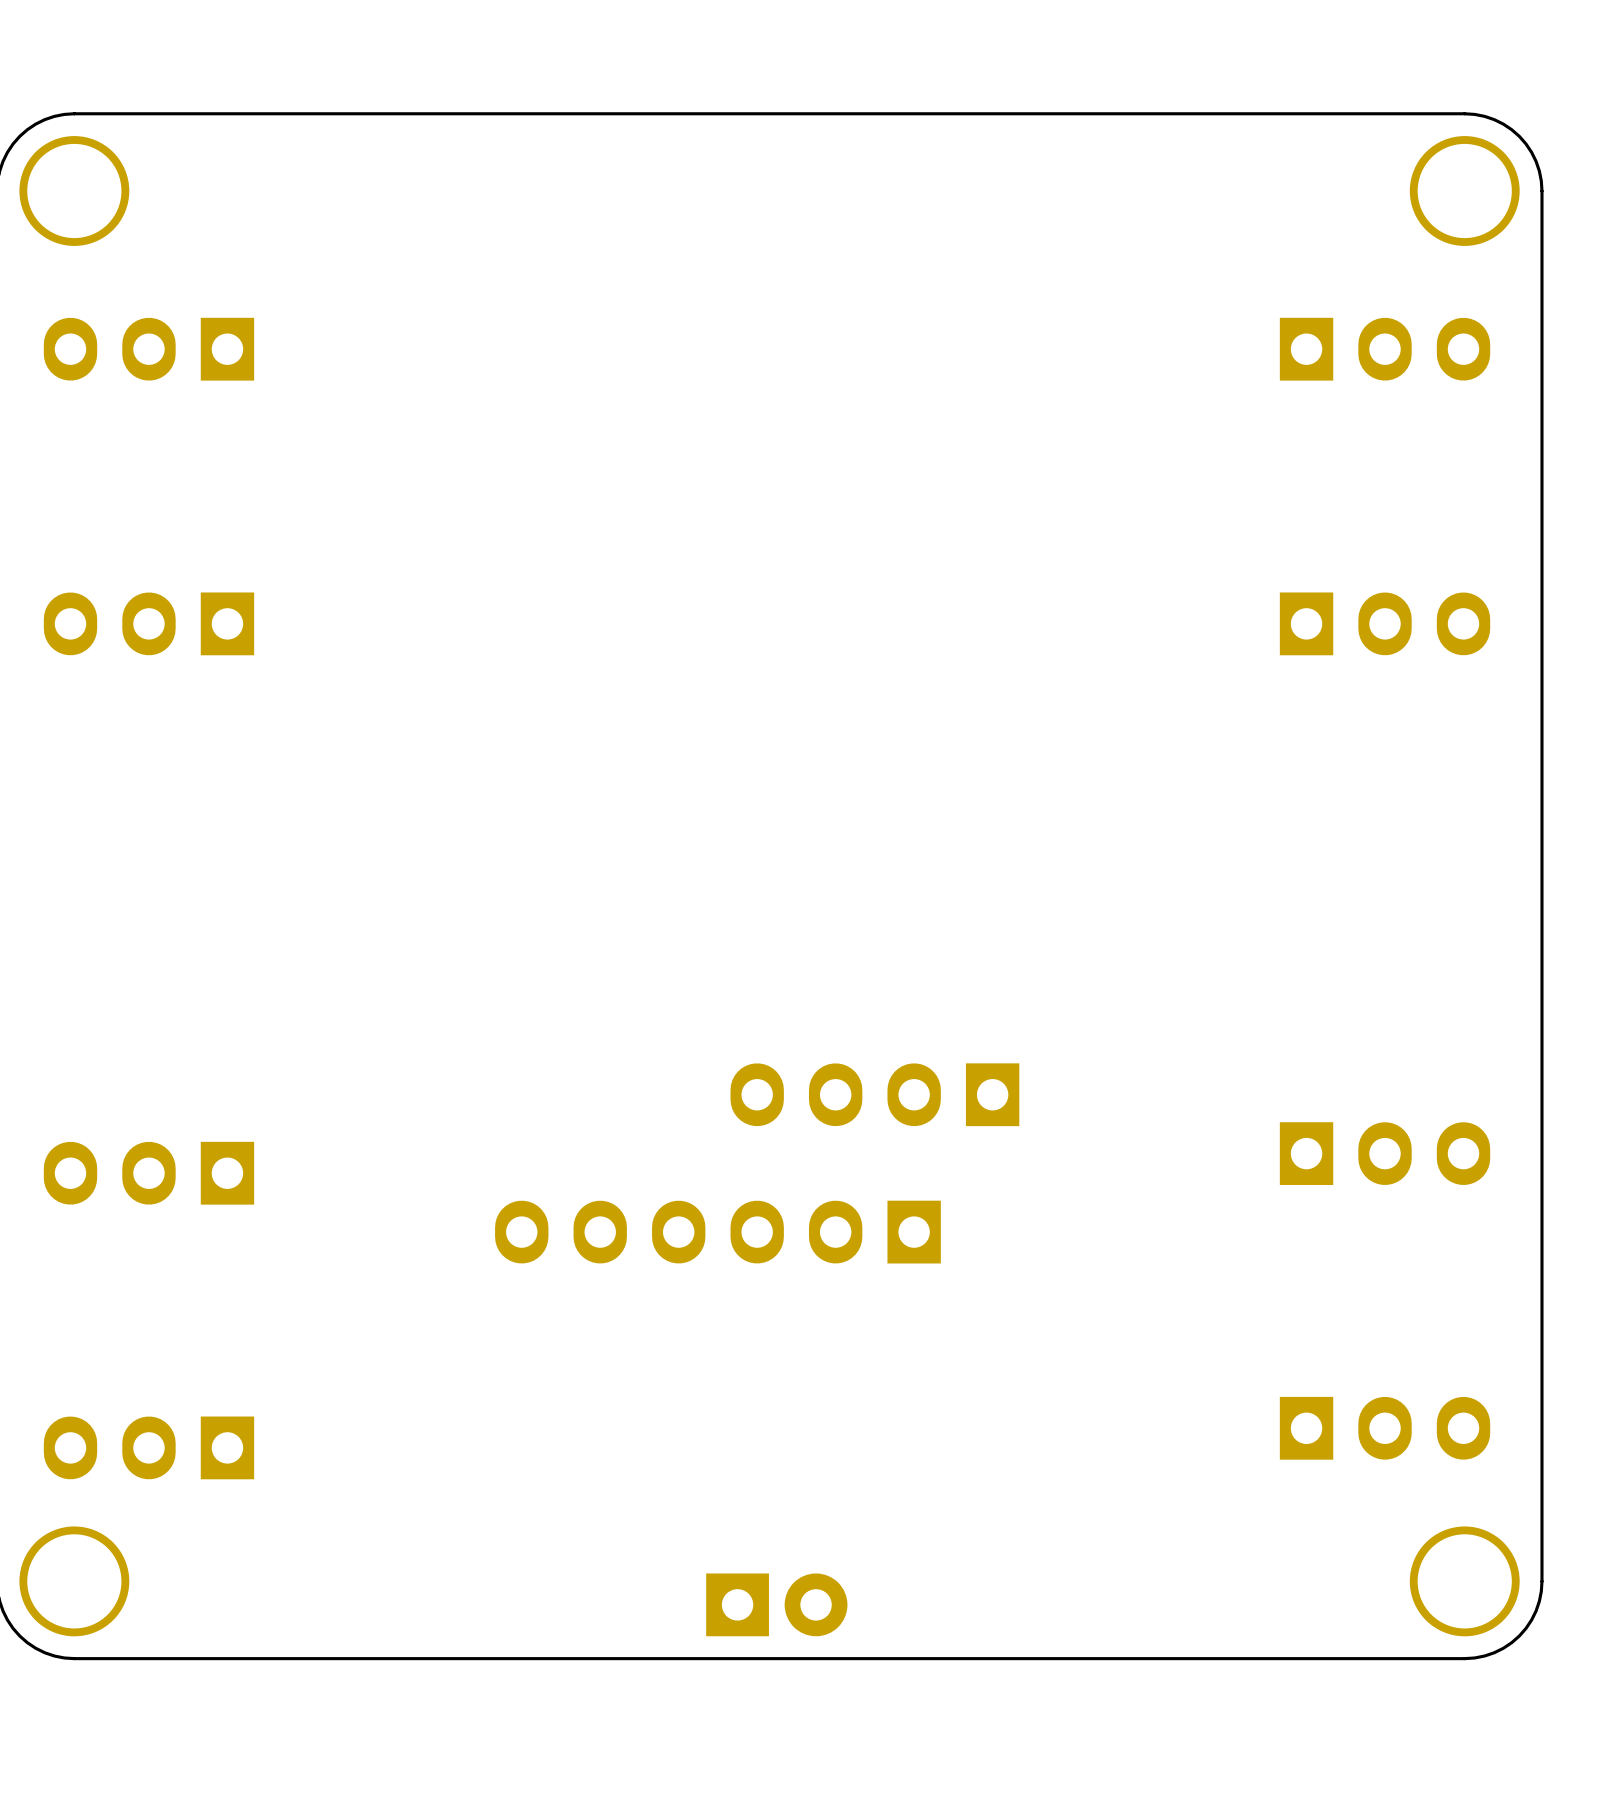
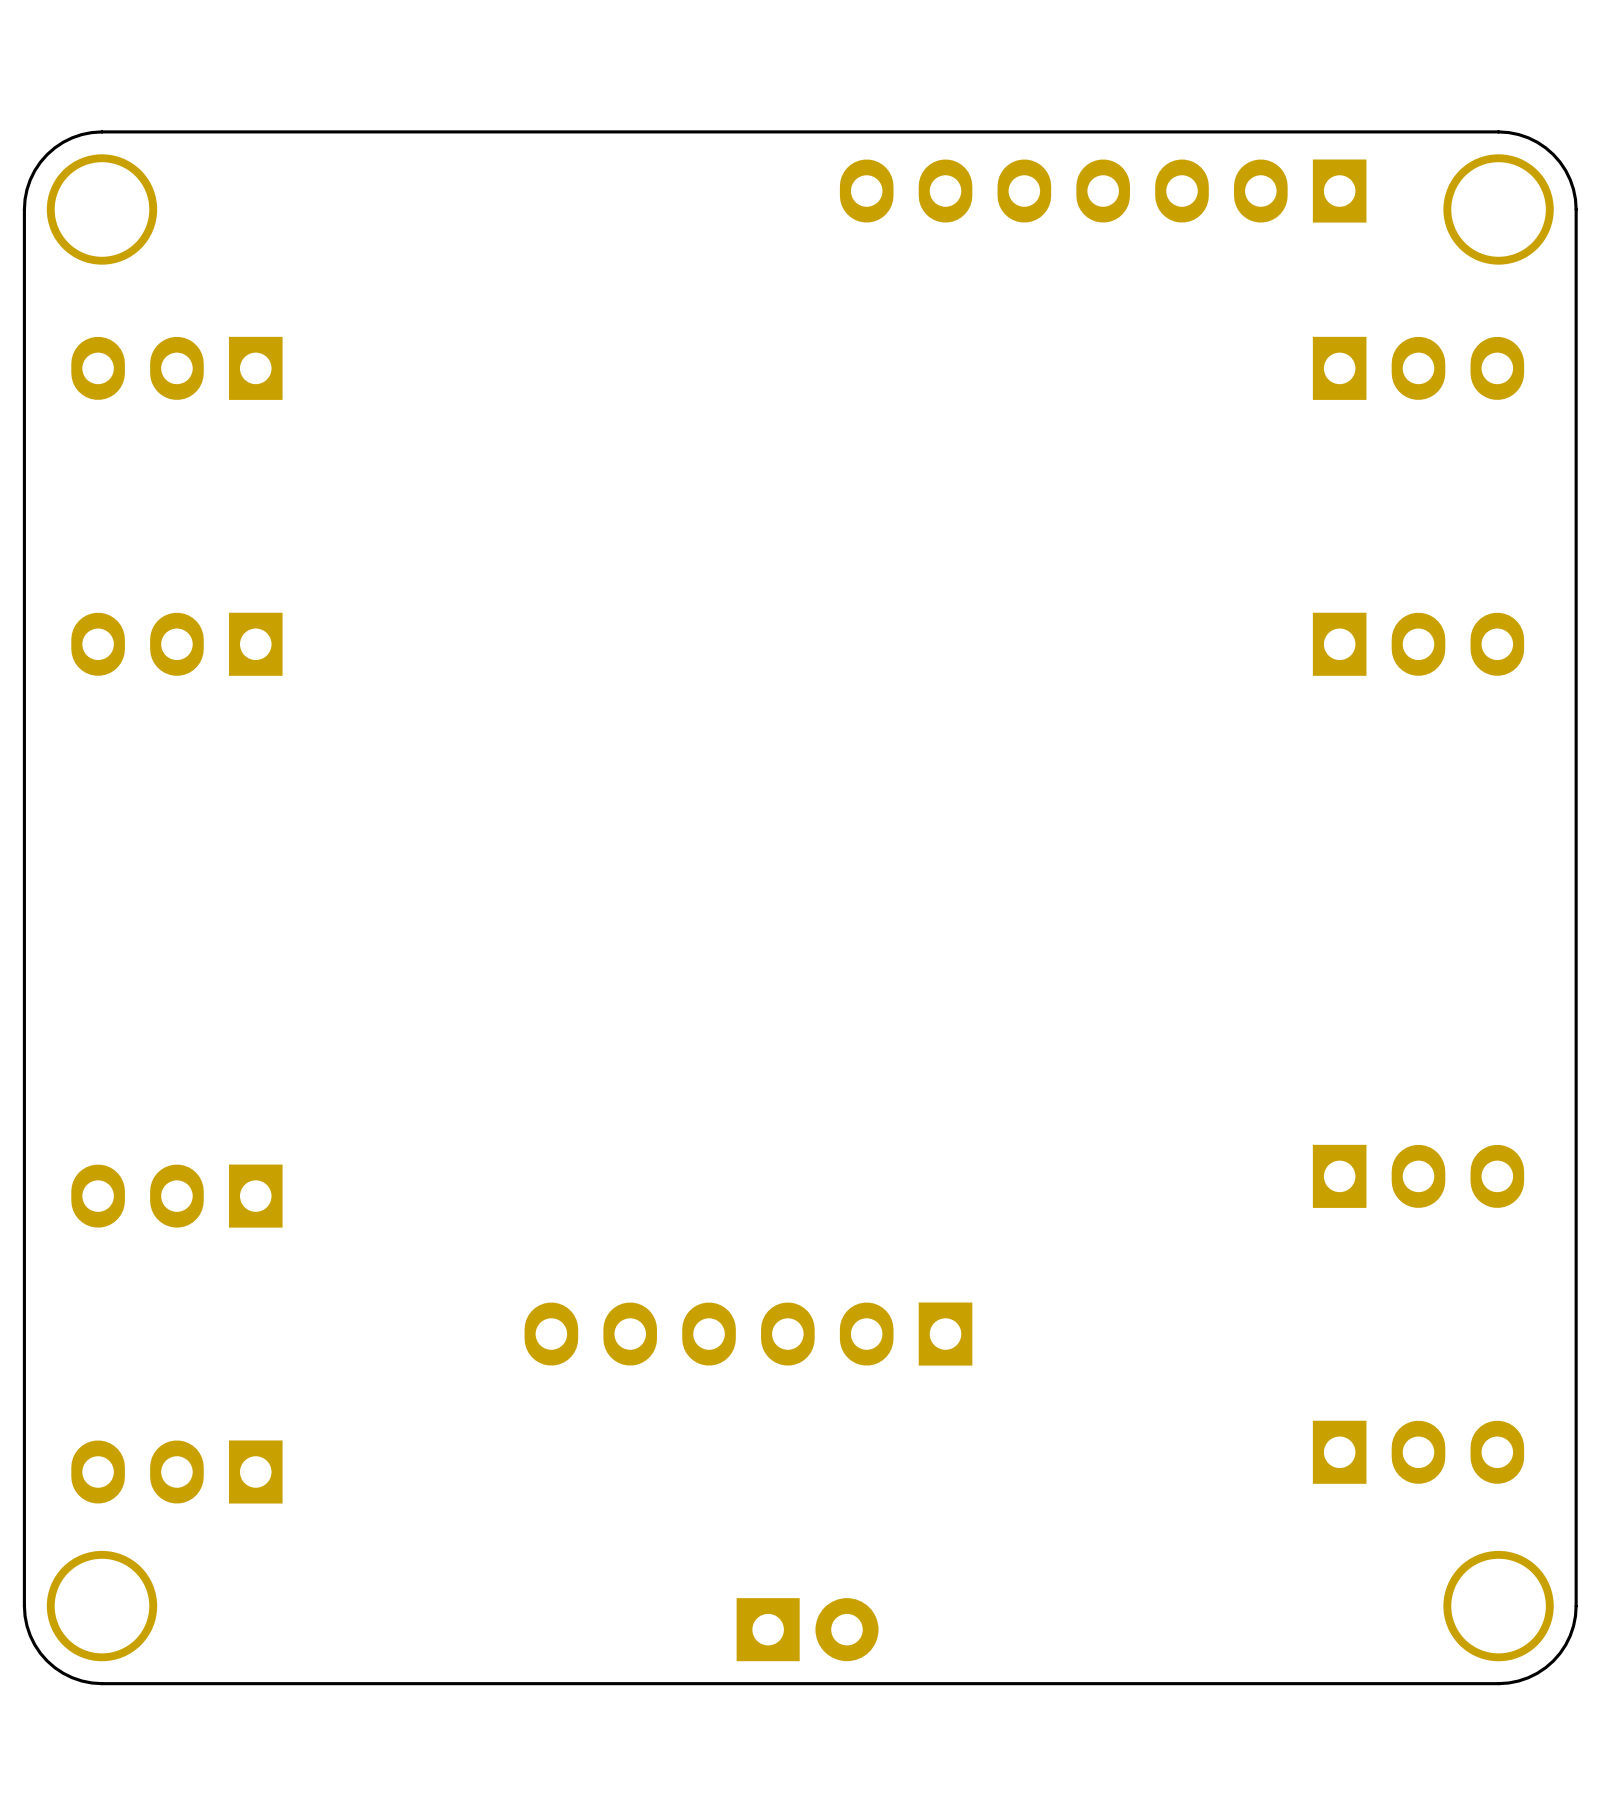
part: none -> (1103, 191)
part: (874, 1094) -> none
part position: (717, 1232) -> (748, 1334)

